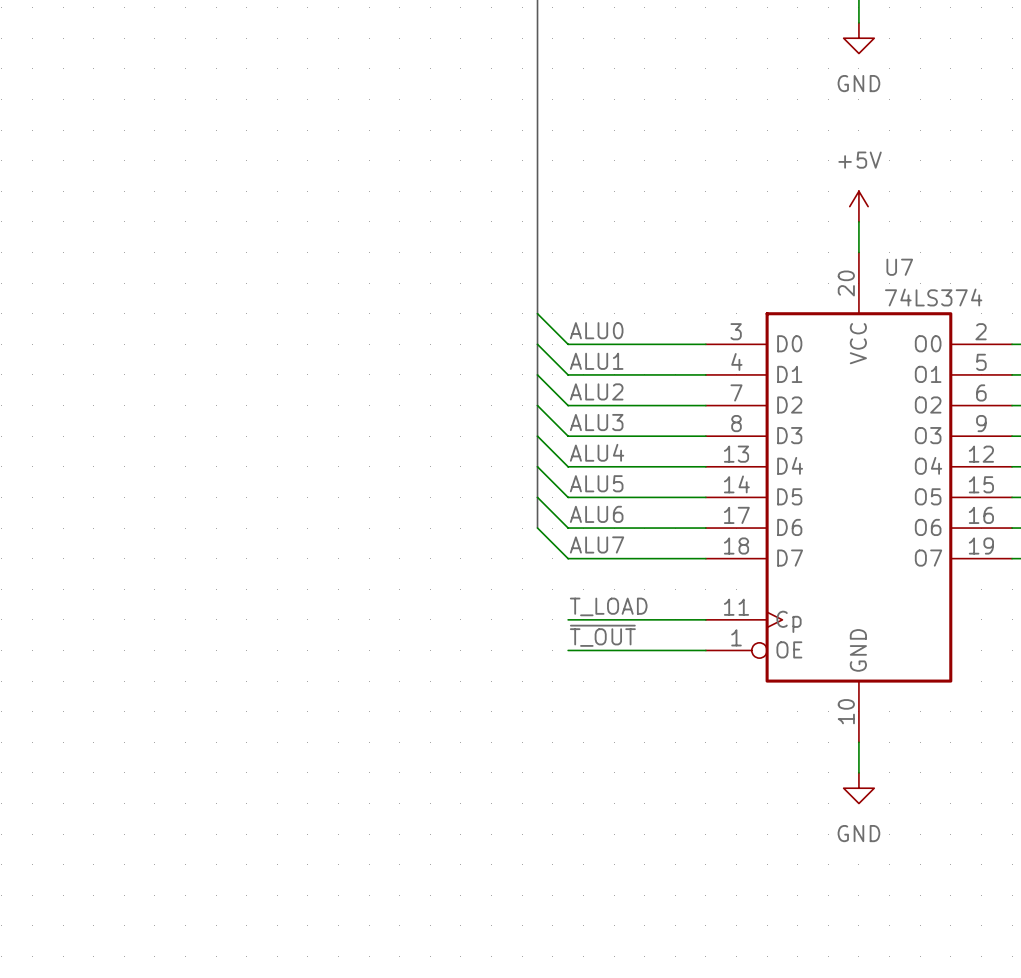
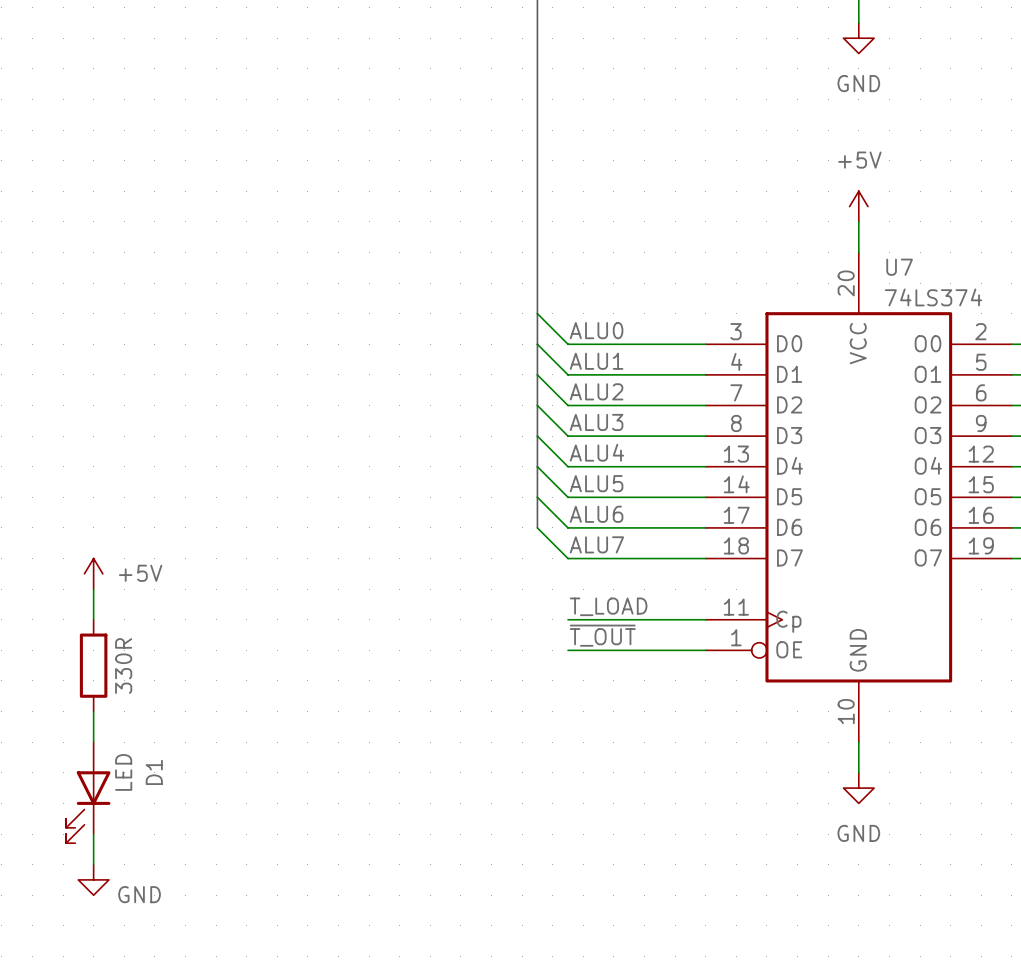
power symbol: none -> +5V (93, 573)
wire: none -> (93, 589) (93, 619)
part: none -> 330R (93, 665)
wire: none -> (93, 711) (93, 742)
D1: none -> LED (88, 792)
wire: none -> (93, 834) (93, 864)
power symbol: none -> GND (93, 879)

